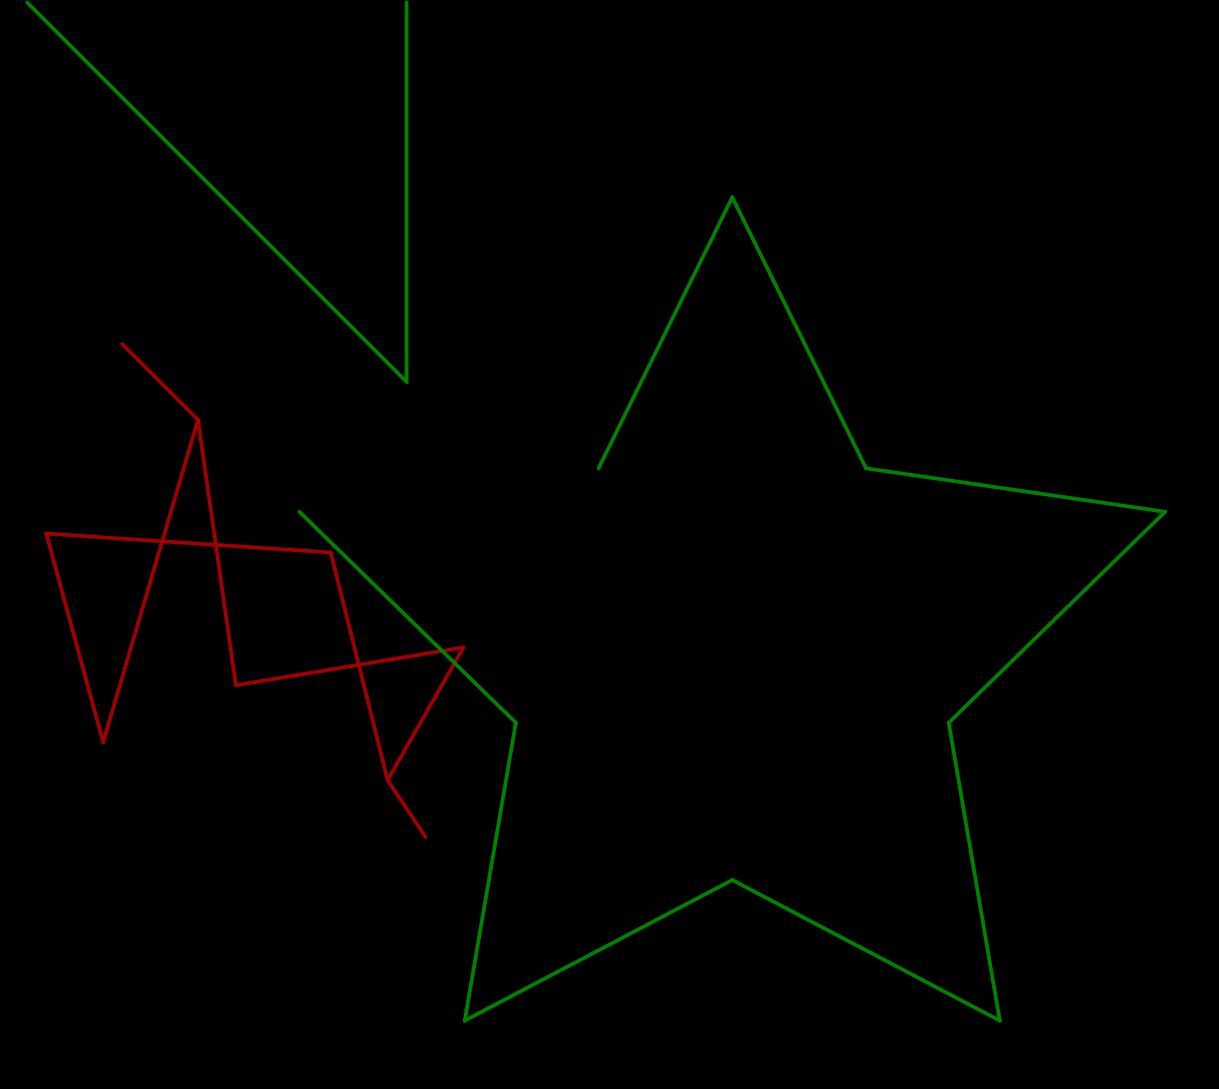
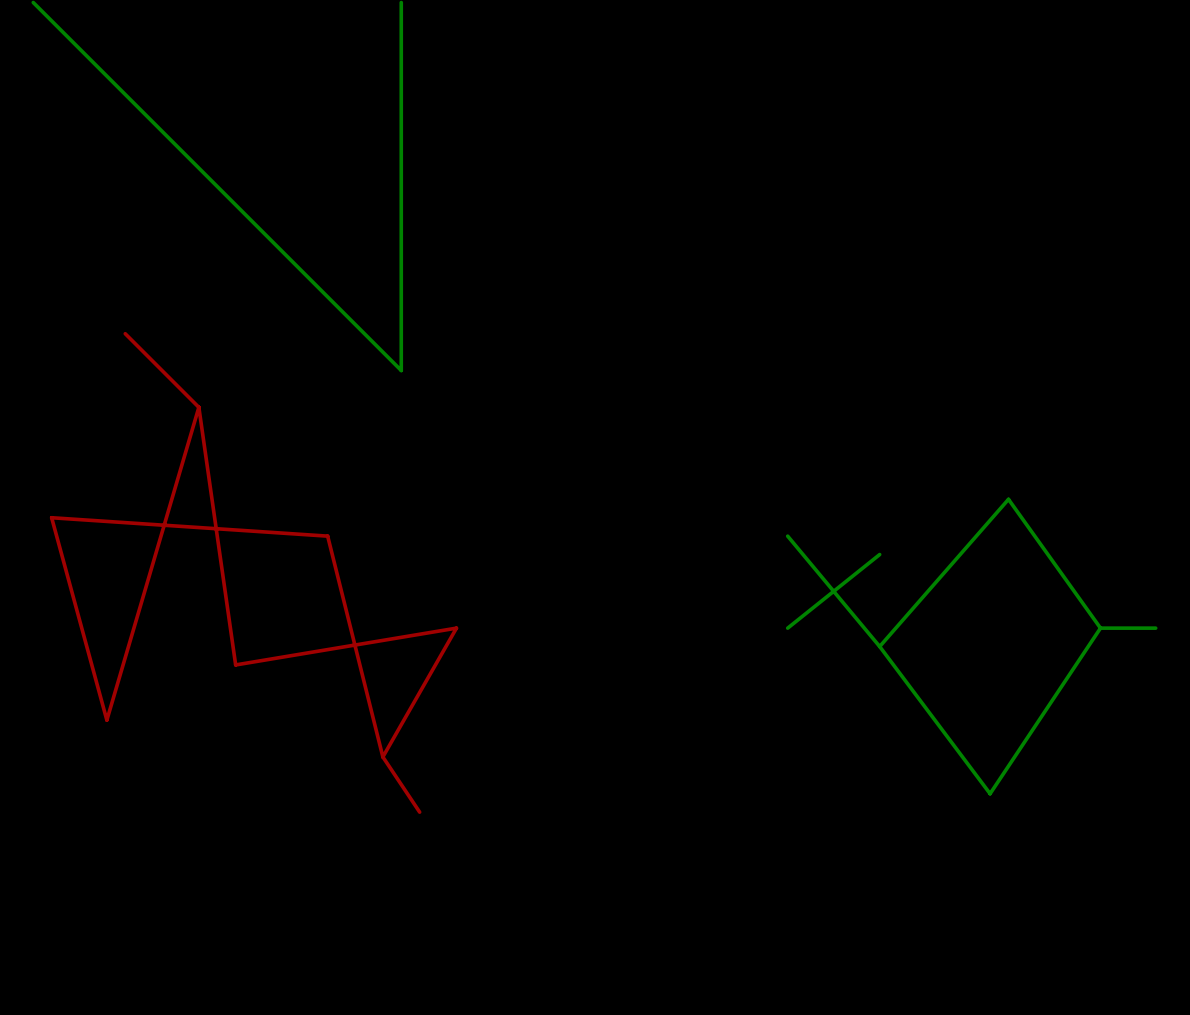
bottom track: (598, 468) (732, 197) (866, 468) (1165, 511) (948, 722) (999, 1020) (732, 880) (464, 1020) (515, 722) (299, 511) -> none
bottom track: none -> (787, 536) (879, 646)
bottom track: none -> (879, 554) (787, 628)
bottom track: none -> (1100, 628) (1008, 499) (879, 646)
bottom track: none -> (1100, 628) (990, 793) (879, 646)
bottom track: none -> (1155, 628) (1100, 628)

